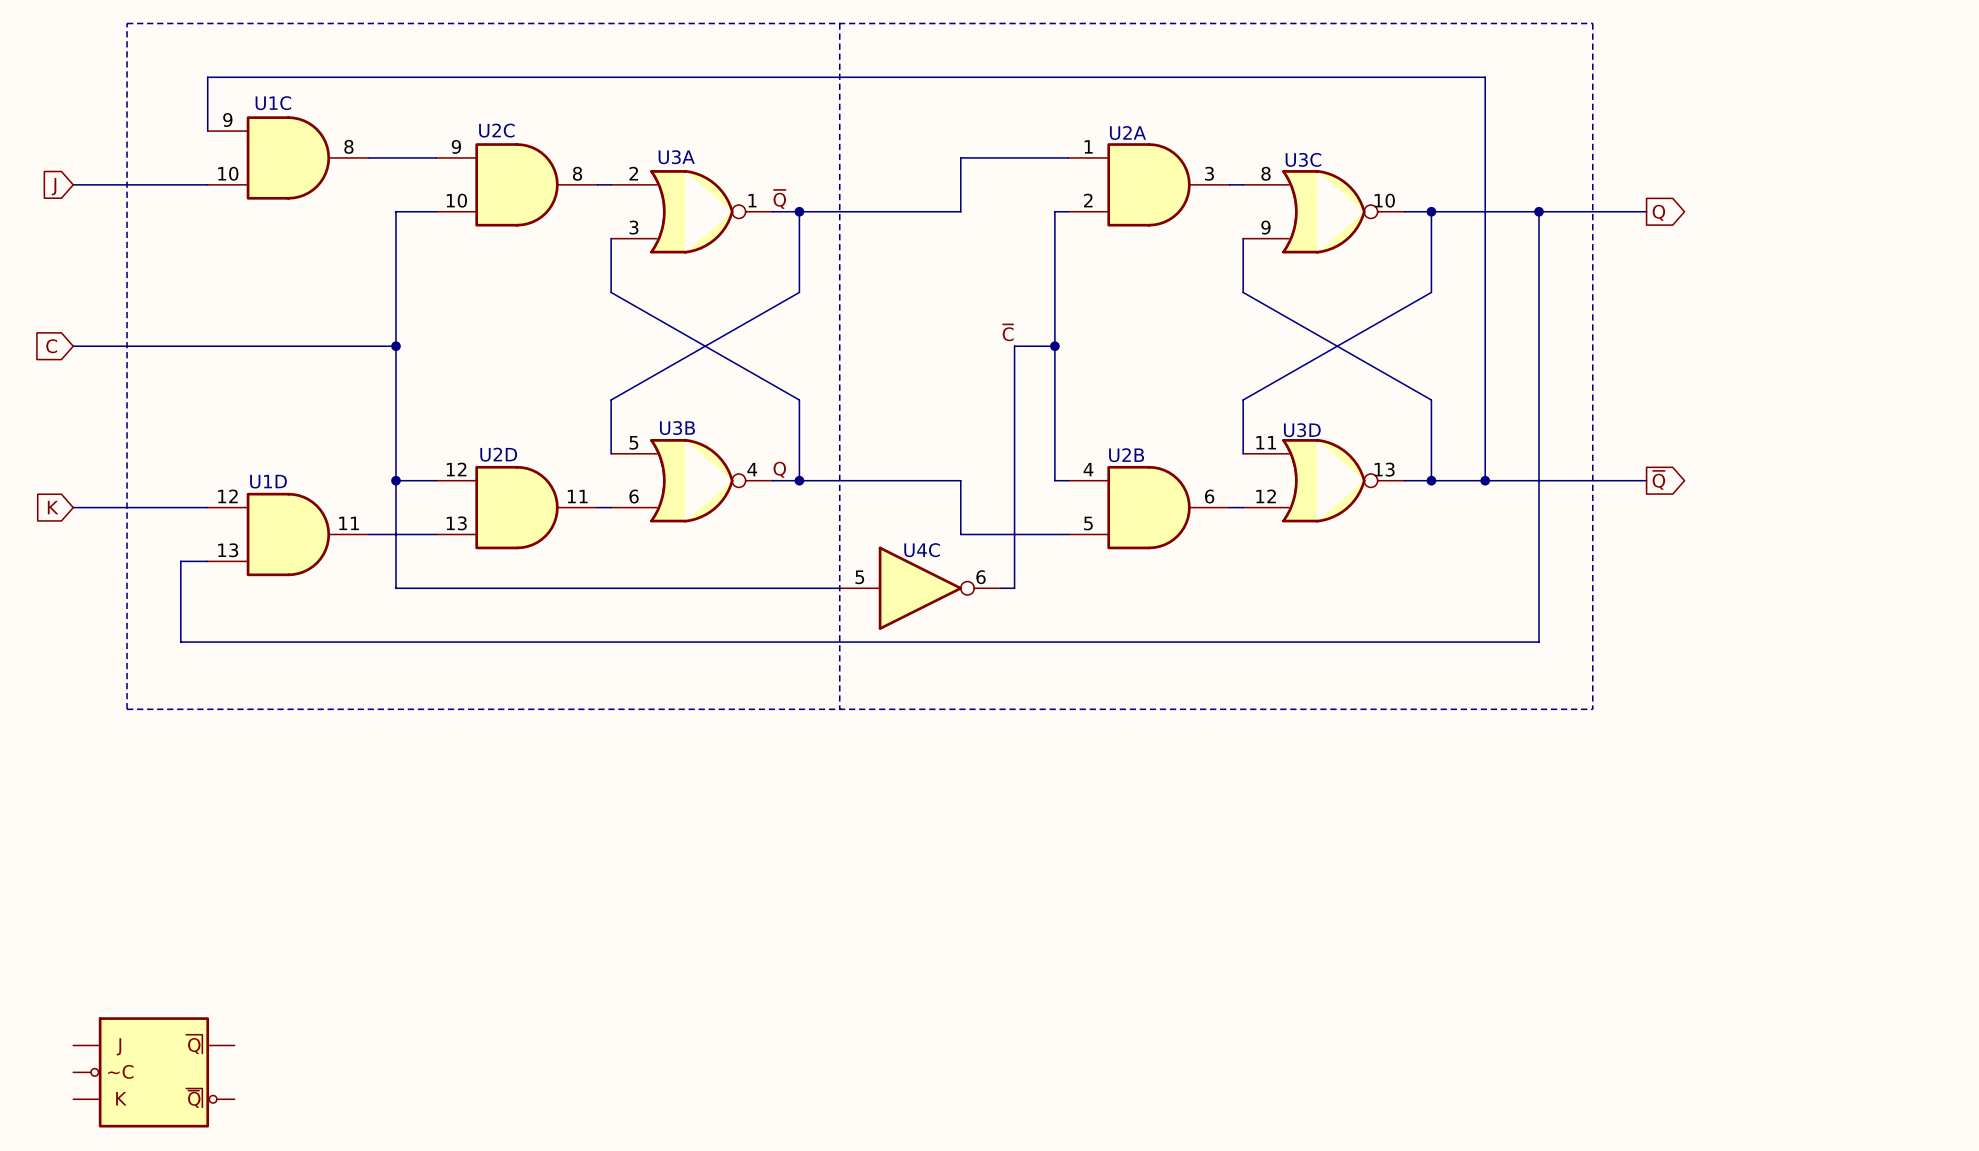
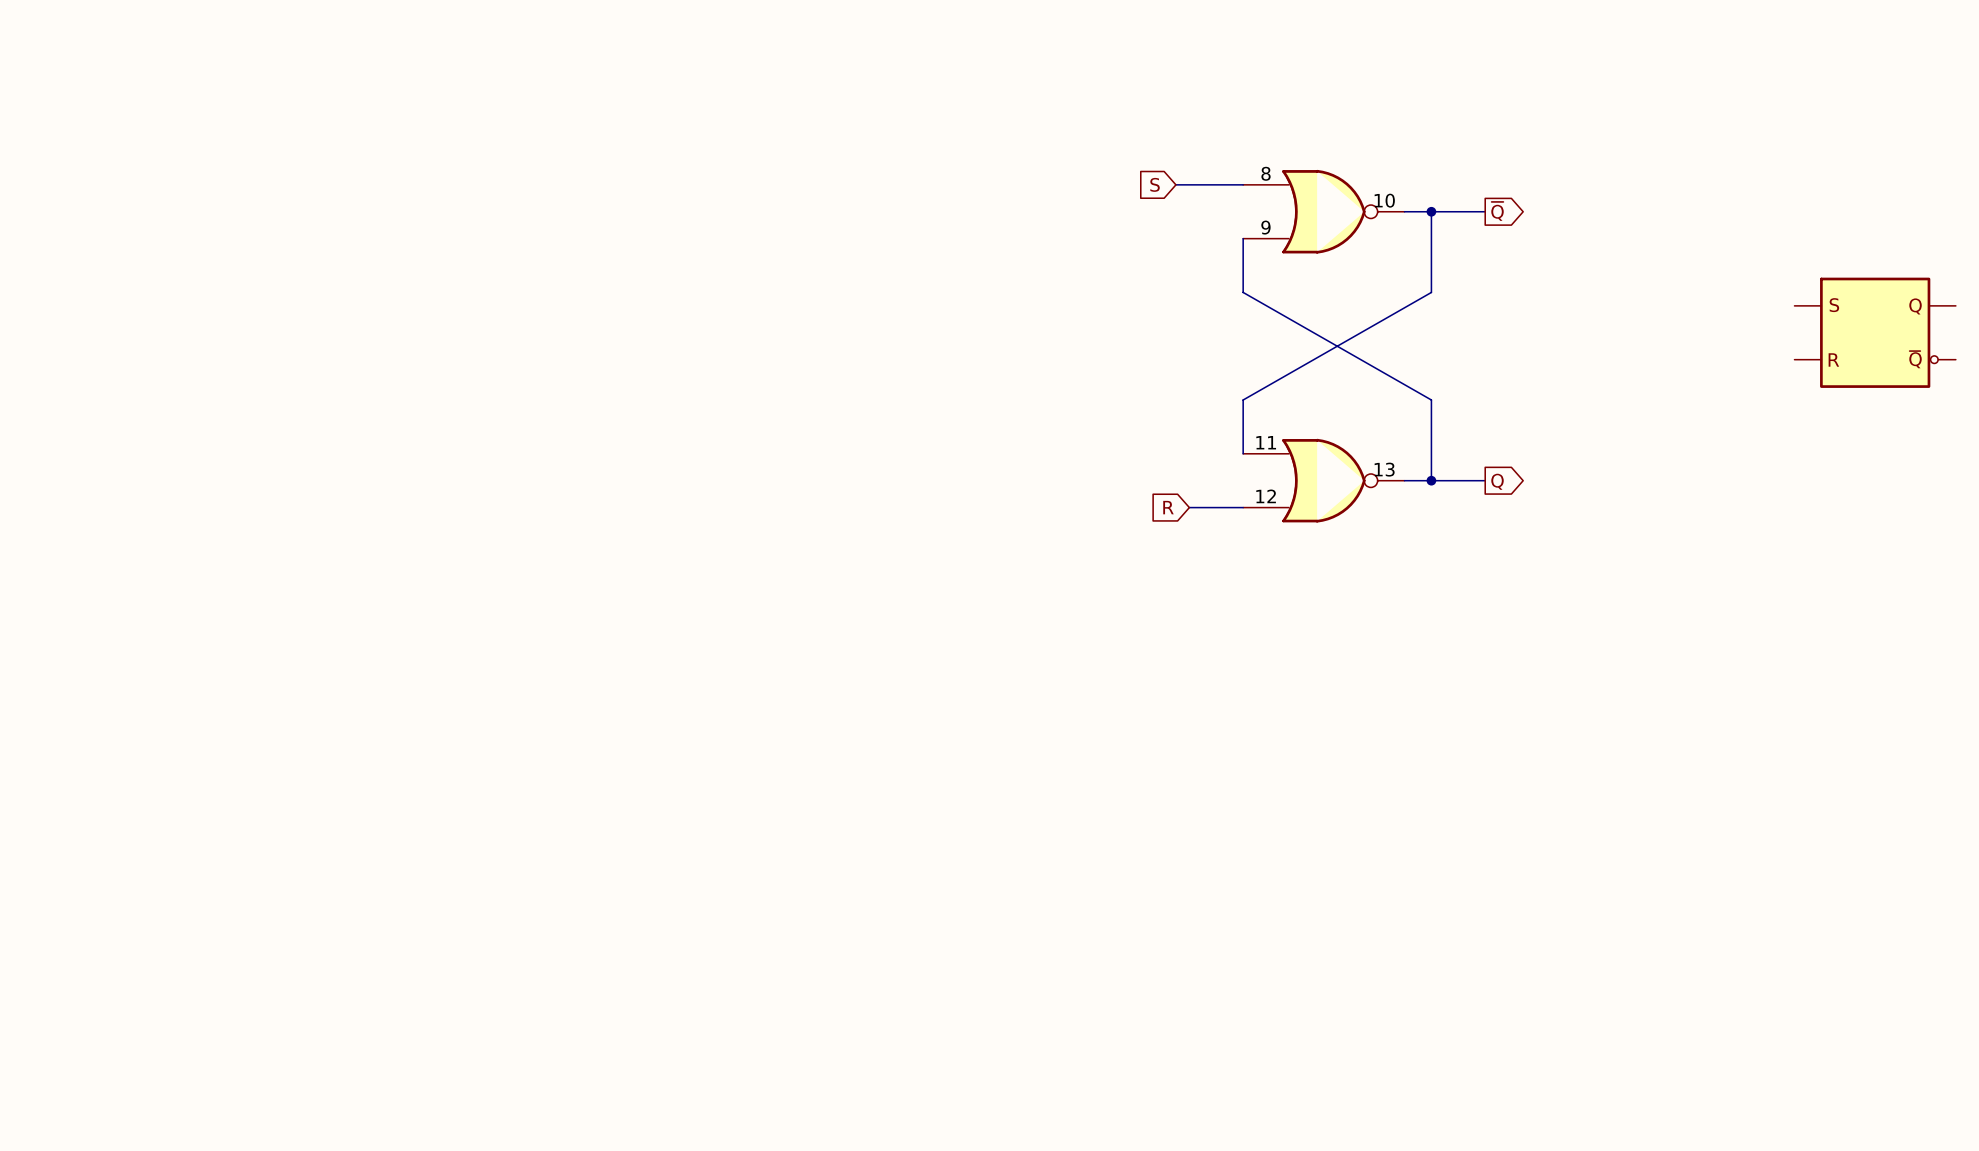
line: (127, 23) (127, 709) (1592, 709) (1592, 23) (127, 23) -> none
line: (839, 23) (839, 709) -> none
wire: (207, 131) (207, 77) (1485, 77) (1485, 480) (1646, 480) -> none
U1C: (288, 157) -> none
wire: (369, 157) (436, 157) -> none
wire: (1068, 157) (960, 157) (960, 211) (772, 211) -> none
U3C name: U3C (1303, 159) -> none
wire: (73, 184) (207, 184) -> none
U2C: (517, 184) -> none
wire: (597, 184) (611, 184) -> none
U2A: (1149, 184) -> none
global label: none -> S (1155, 184)
global label: J (54, 186) -> none
label: ~{Q} (779, 199) -> none
wire: (436, 211) (395, 211) (395, 588) (839, 588) -> none
U3A: (691, 211) -> none
wire: (799, 211) (799, 292) (611, 400) (611, 453) -> none
junction: (799, 211) -> none
wire: (1068, 211) (1054, 211) (1054, 480) (1068, 480) -> none
wire: (1485, 211) (1646, 211) -> none
global label: none -> ~{Q} (1497, 211)
wire: (1539, 211) (1539, 642) (180, 642) (180, 561) (207, 561) -> none
junction: (1539, 211) -> none
global label: Q (1658, 212) -> none
wire: (611, 238) (611, 292) (799, 400) (799, 480) -> none
label: ~{C} (1008, 332) -> none
part: none -> (1875, 332)
global label: C (51, 346) -> none
wire: (73, 346) (395, 346) -> none
junction: (395, 346) -> none
wire: (1054, 346) (1014, 346) (1014, 588) (1001, 588) -> none
junction: (1054, 346) -> none
U3D name: U3D (1302, 430) -> none
label: Q (779, 469) -> none
wire: (395, 480) (436, 480) -> none
junction: (395, 480) -> none
U3B: (691, 480) -> none
wire: (772, 480) (960, 480) (960, 534) (1068, 534) -> none
junction: (799, 480) -> none
junction: (1485, 480) -> none
global label: ~{Q} (1658, 480) -> none
global label: none -> Q (1497, 481)
global label: K (53, 507) -> none
wire: (73, 507) (207, 507) -> none
U2D: (517, 507) -> none
wire: (597, 507) (611, 507) -> none
U2B: (1149, 507) -> none
global label: none -> R (1168, 507)
U1D: (288, 534) -> none
wire: (369, 534) (436, 534) -> none
U4C: (920, 588) -> none
part: (153, 1072) -> none

